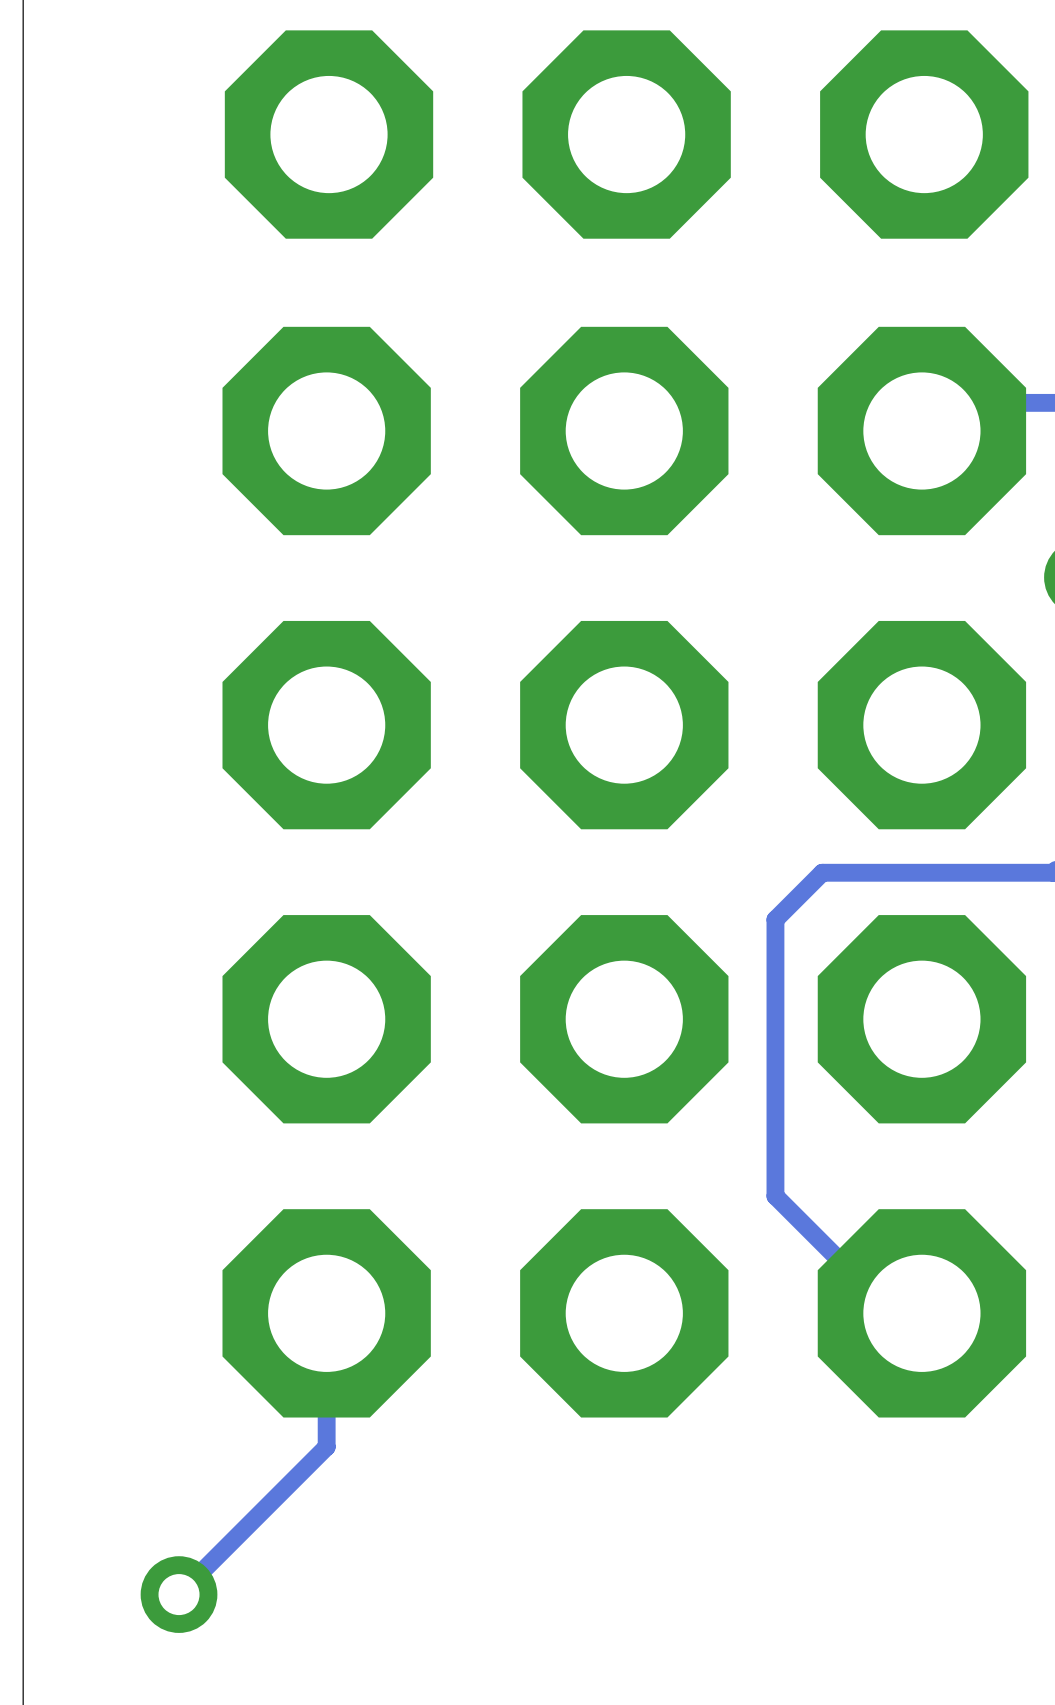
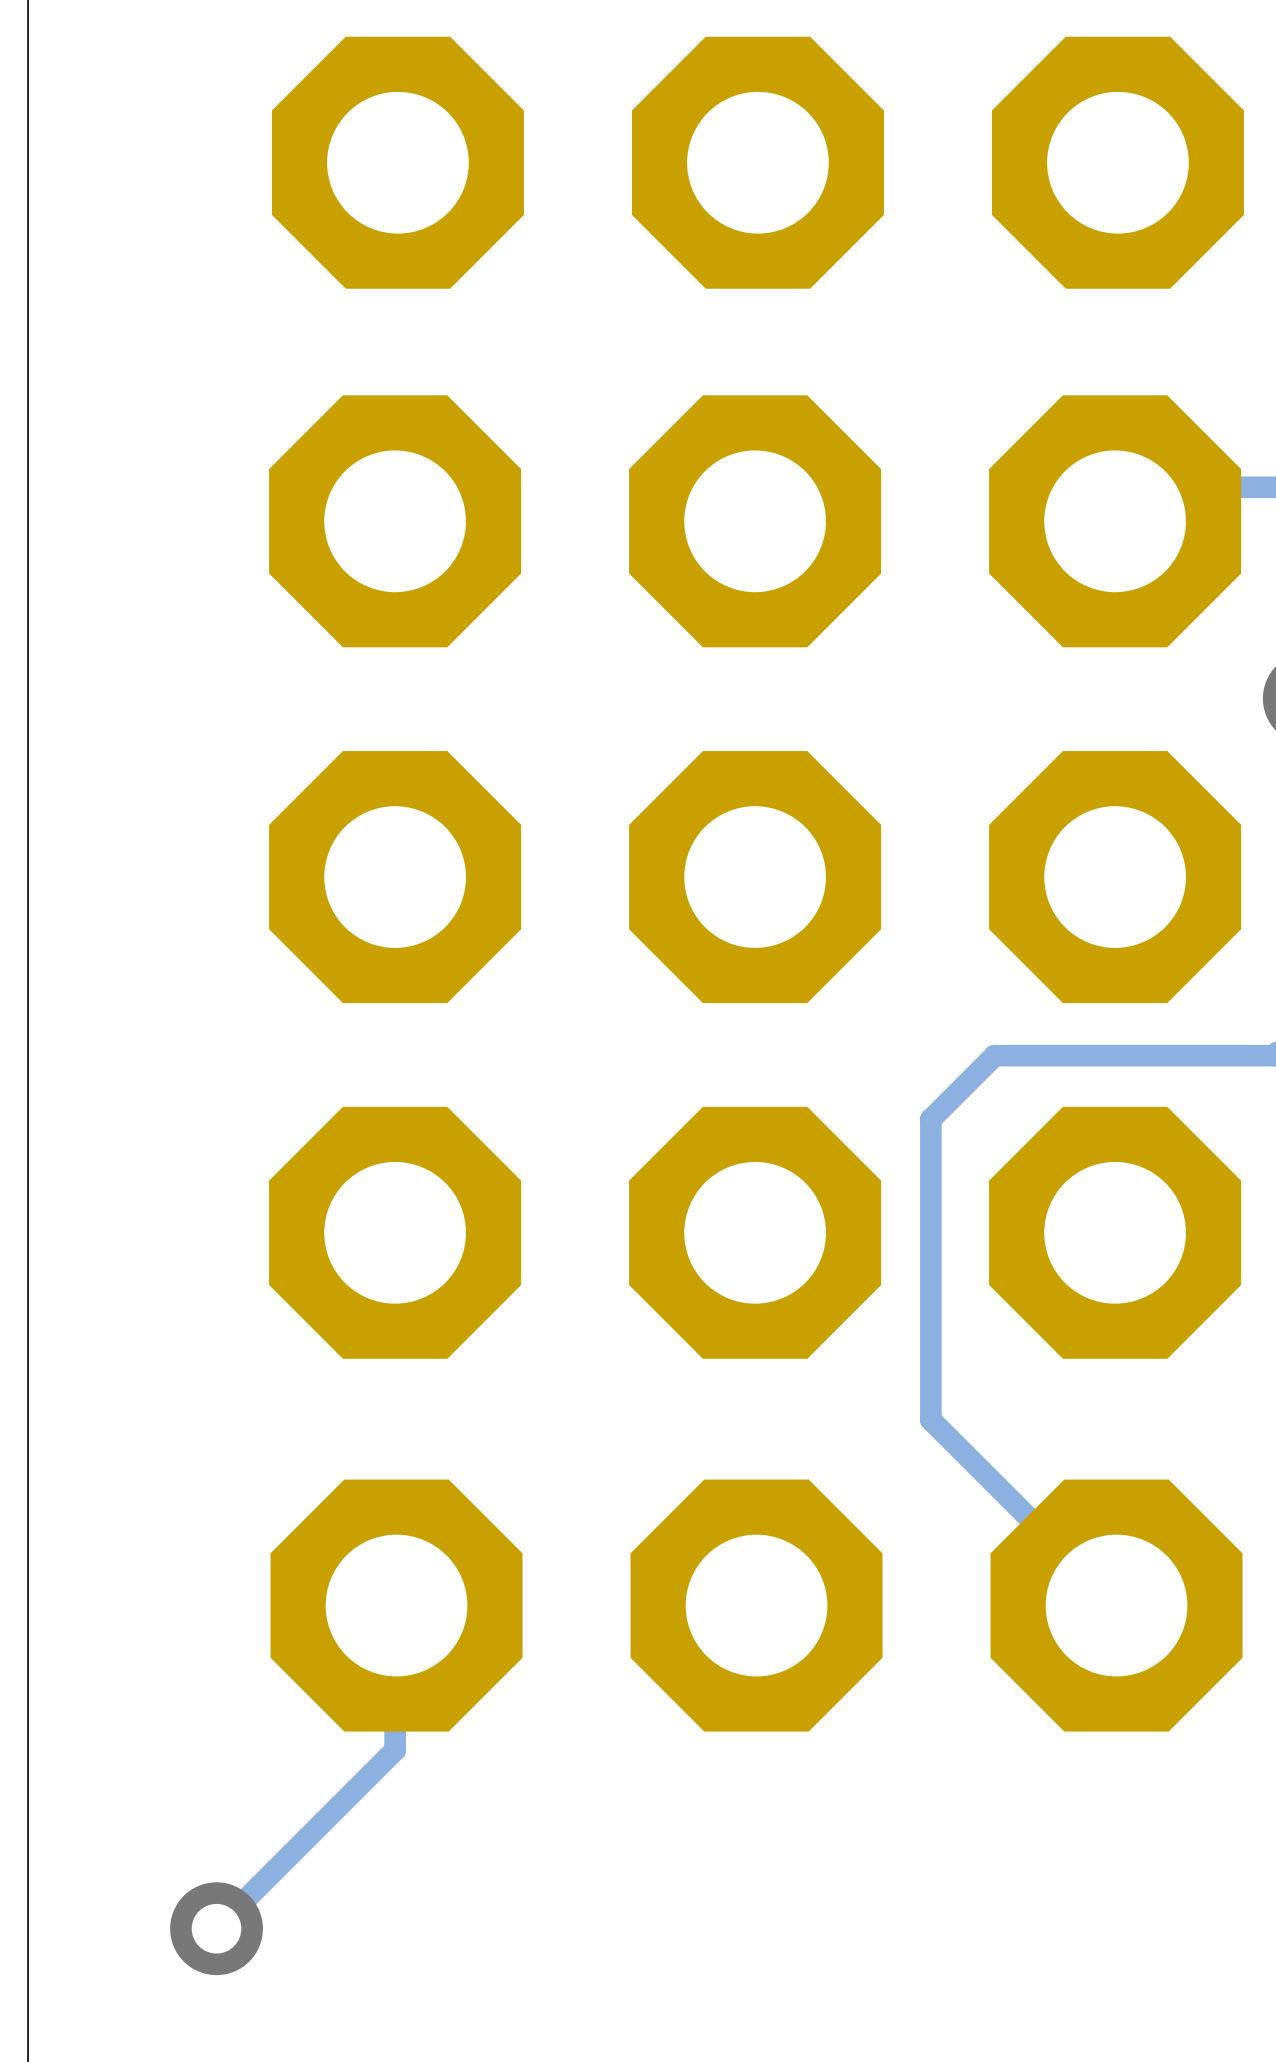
track: (775, 919) (775, 1196) (892, 1313) (921, 1313) -> (937, 1112) (930, 1119) (930, 1419) (1116, 1605)
part position: (624, 1313) -> (756, 1605)

